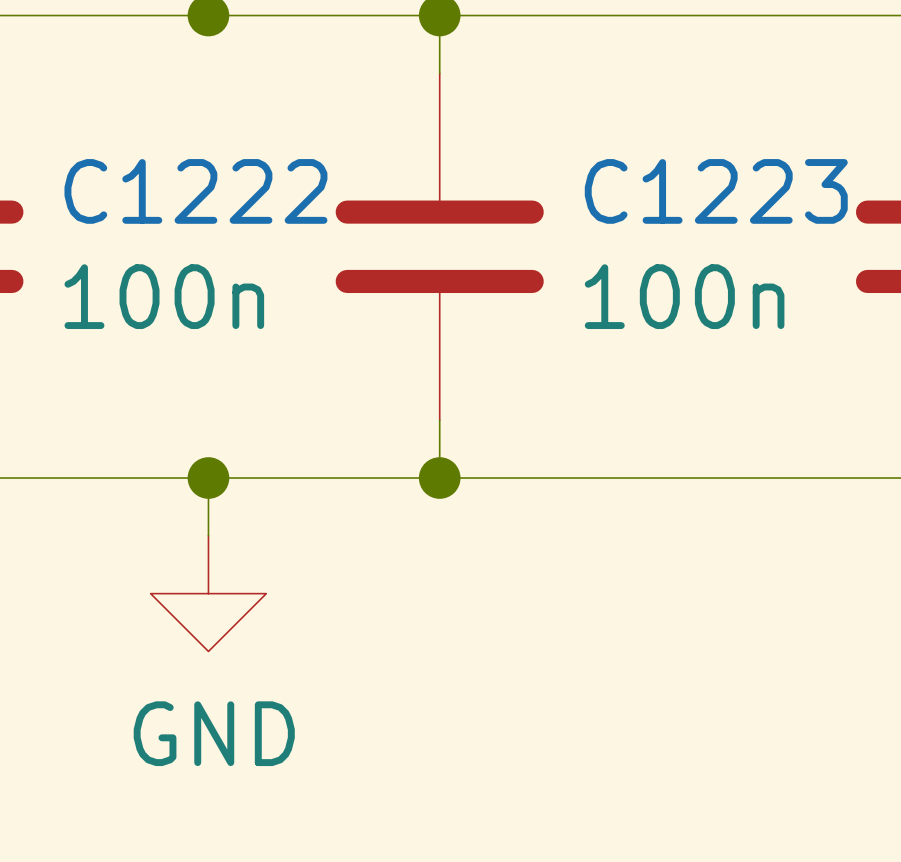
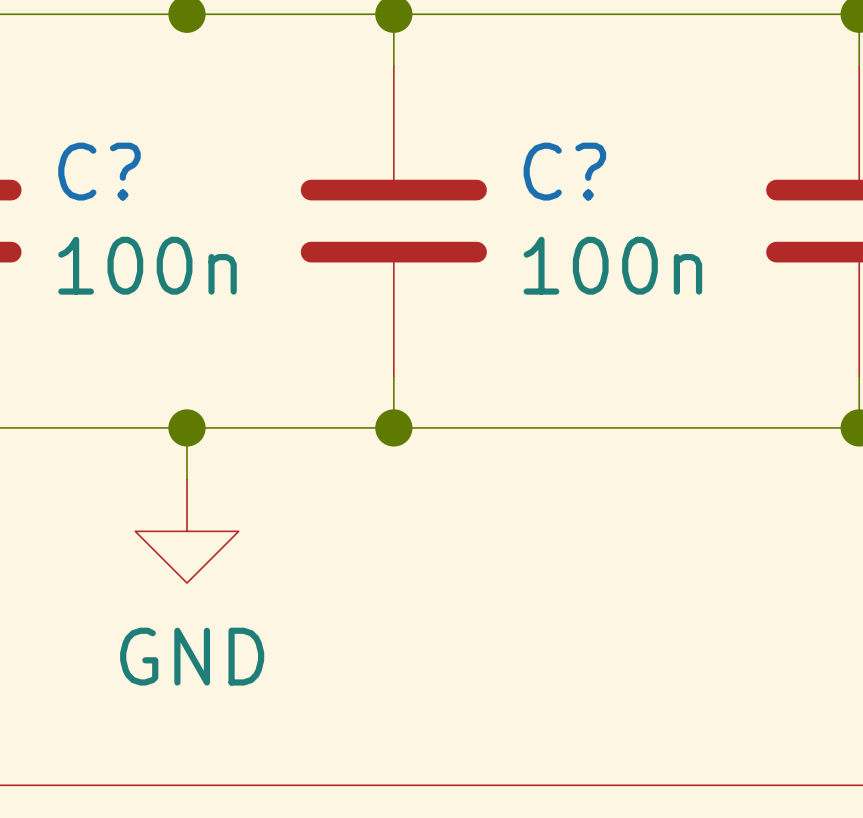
C1222 name: C1222 (195, 191) -> C? (99, 171)
C1223 name: C1223 (716, 191) -> C? (564, 171)

